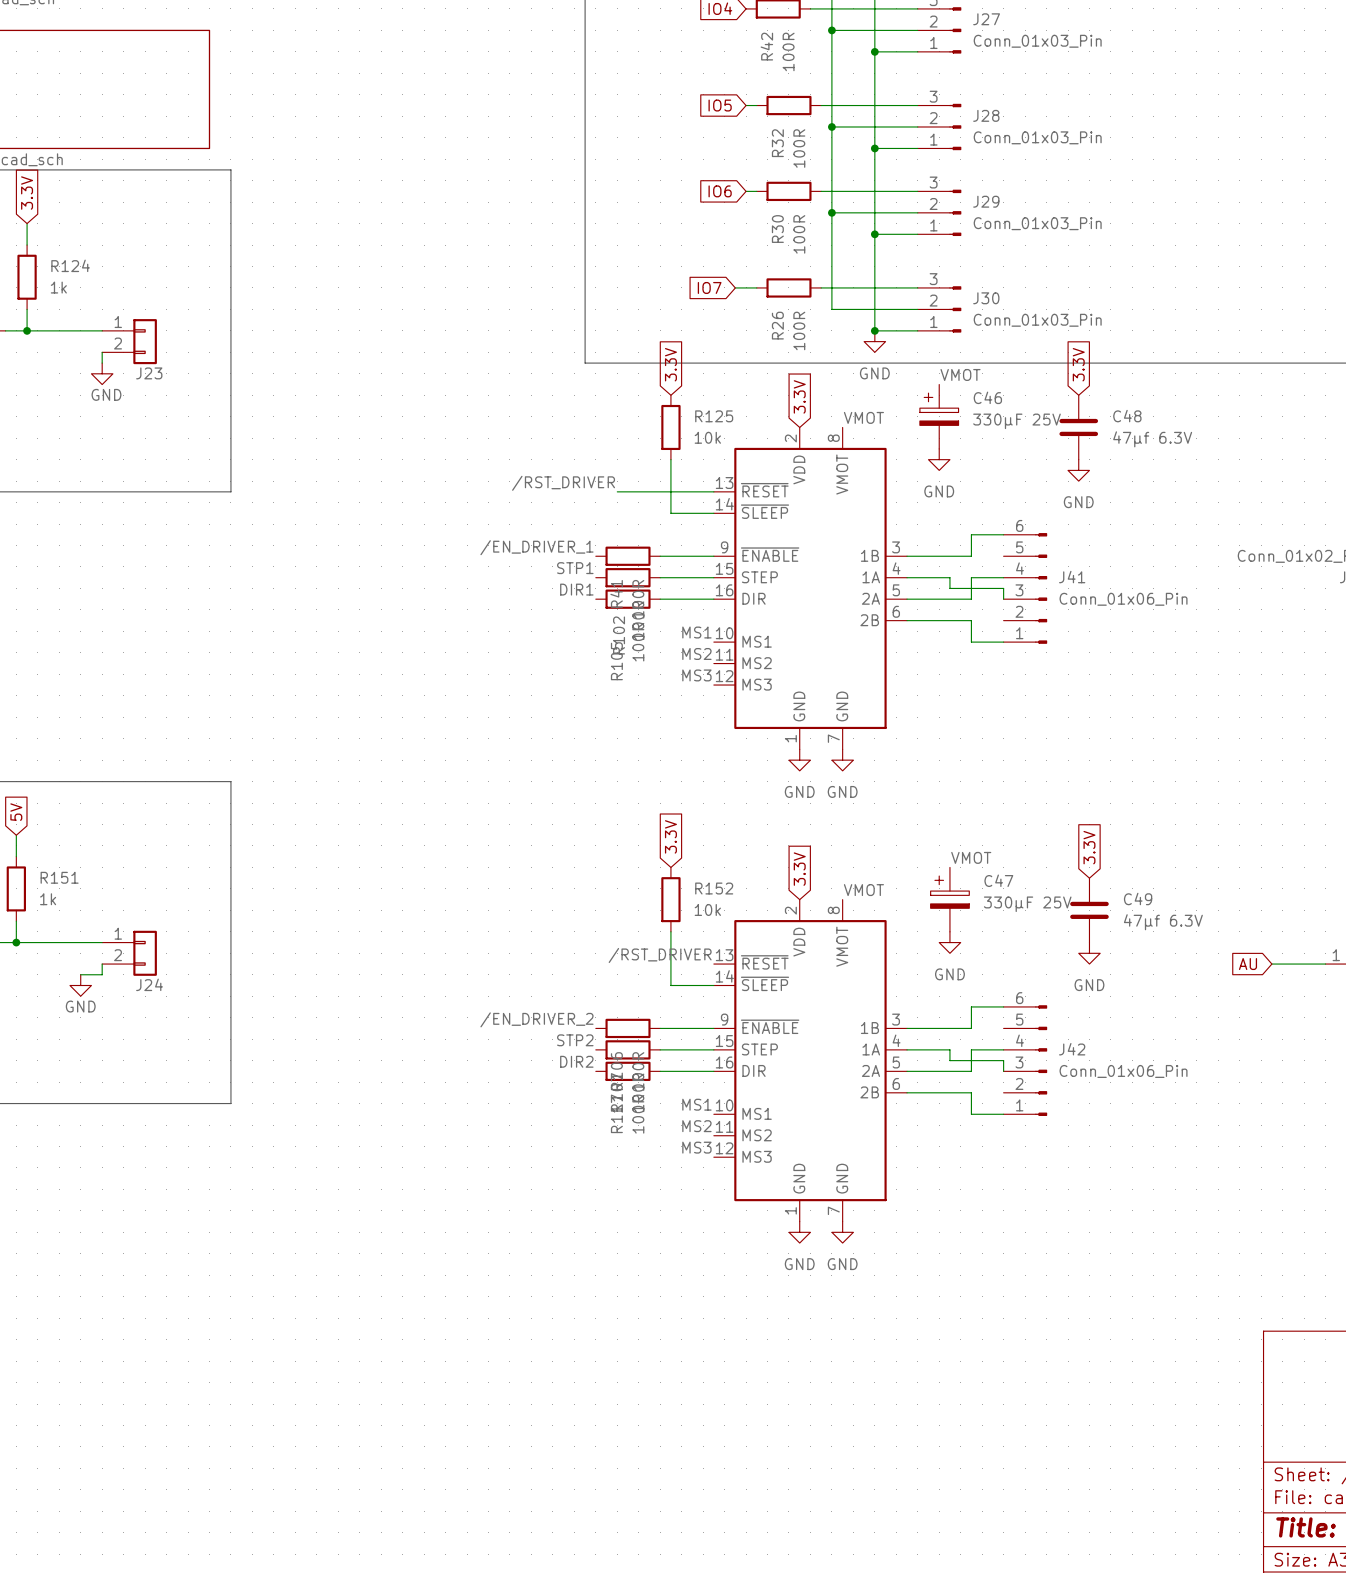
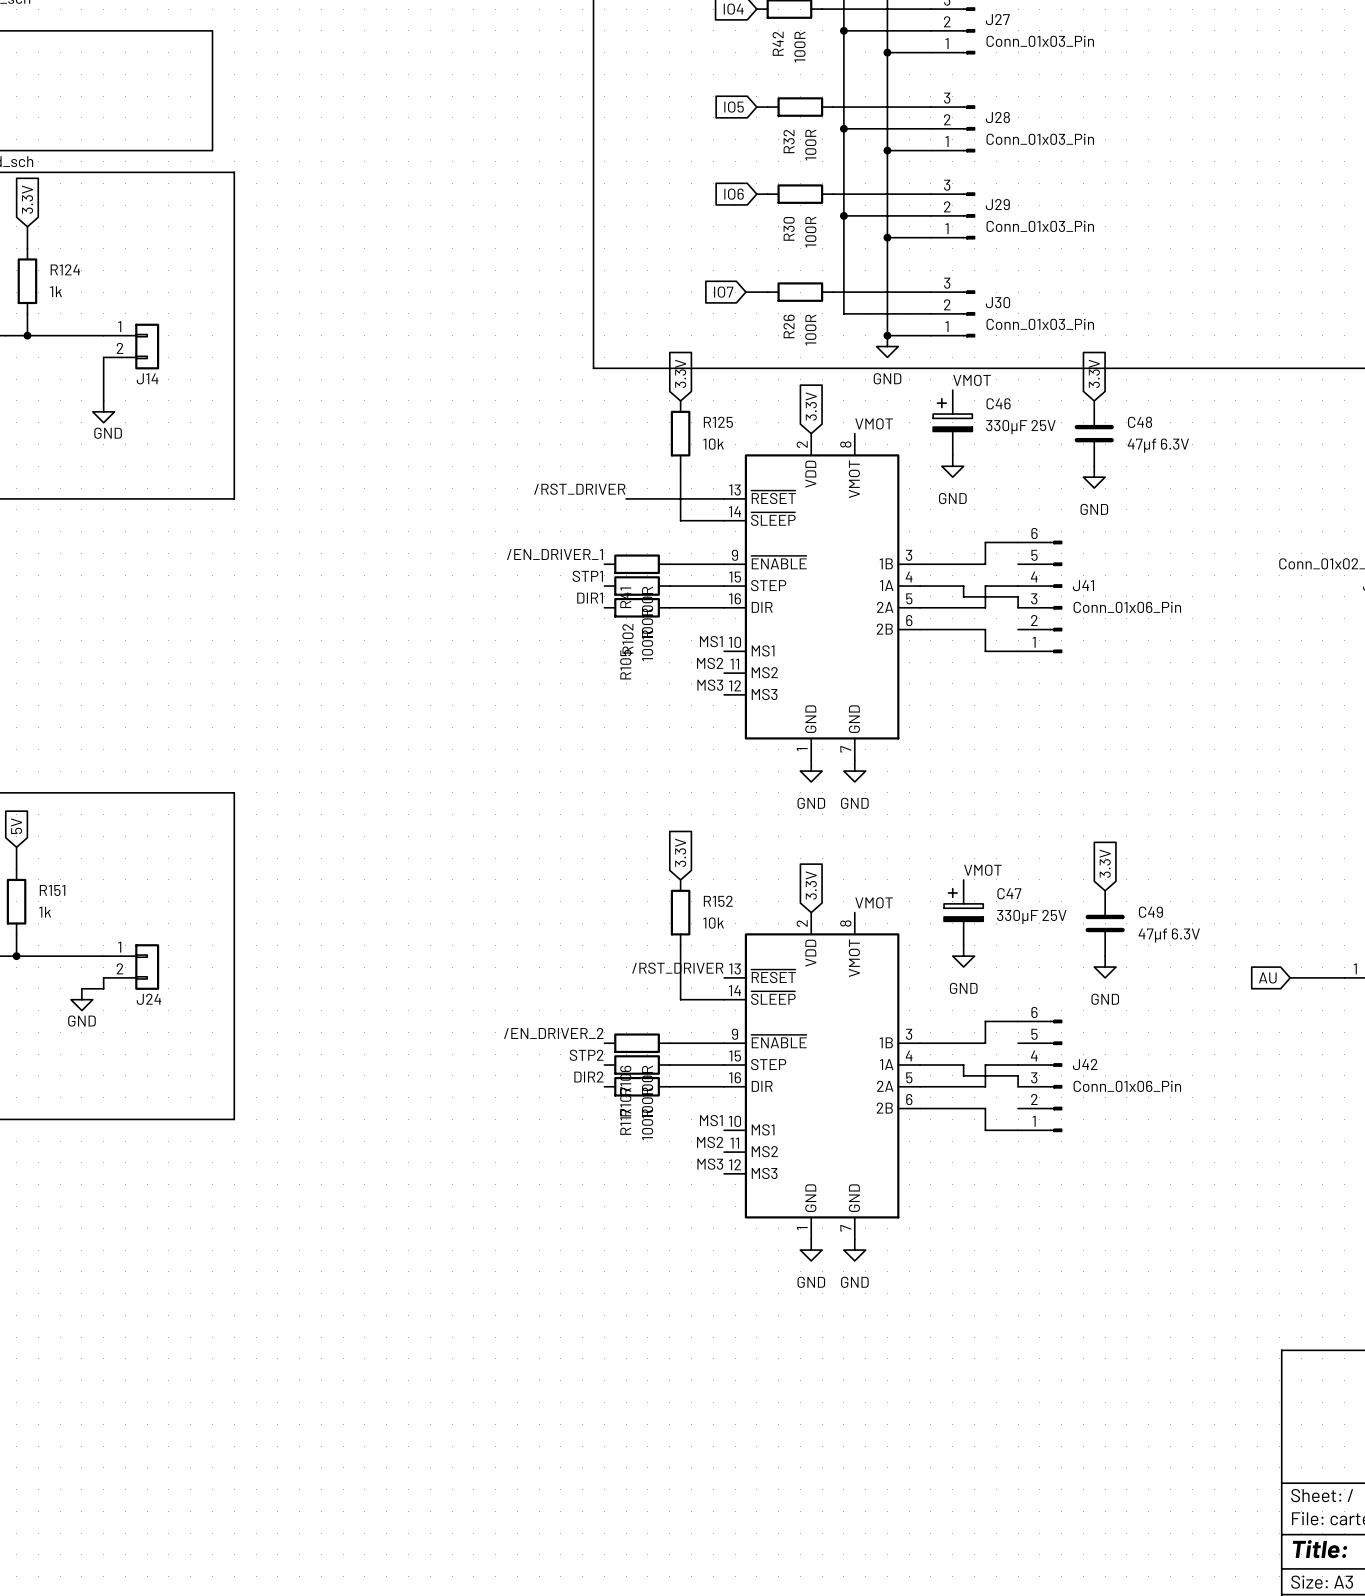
wire: none -> (103, 368) (103, 400)
power symbol position: GND (102, 373) -> GND (103, 411)
J23 name: J23 (149, 373) -> J14 (147, 378)

